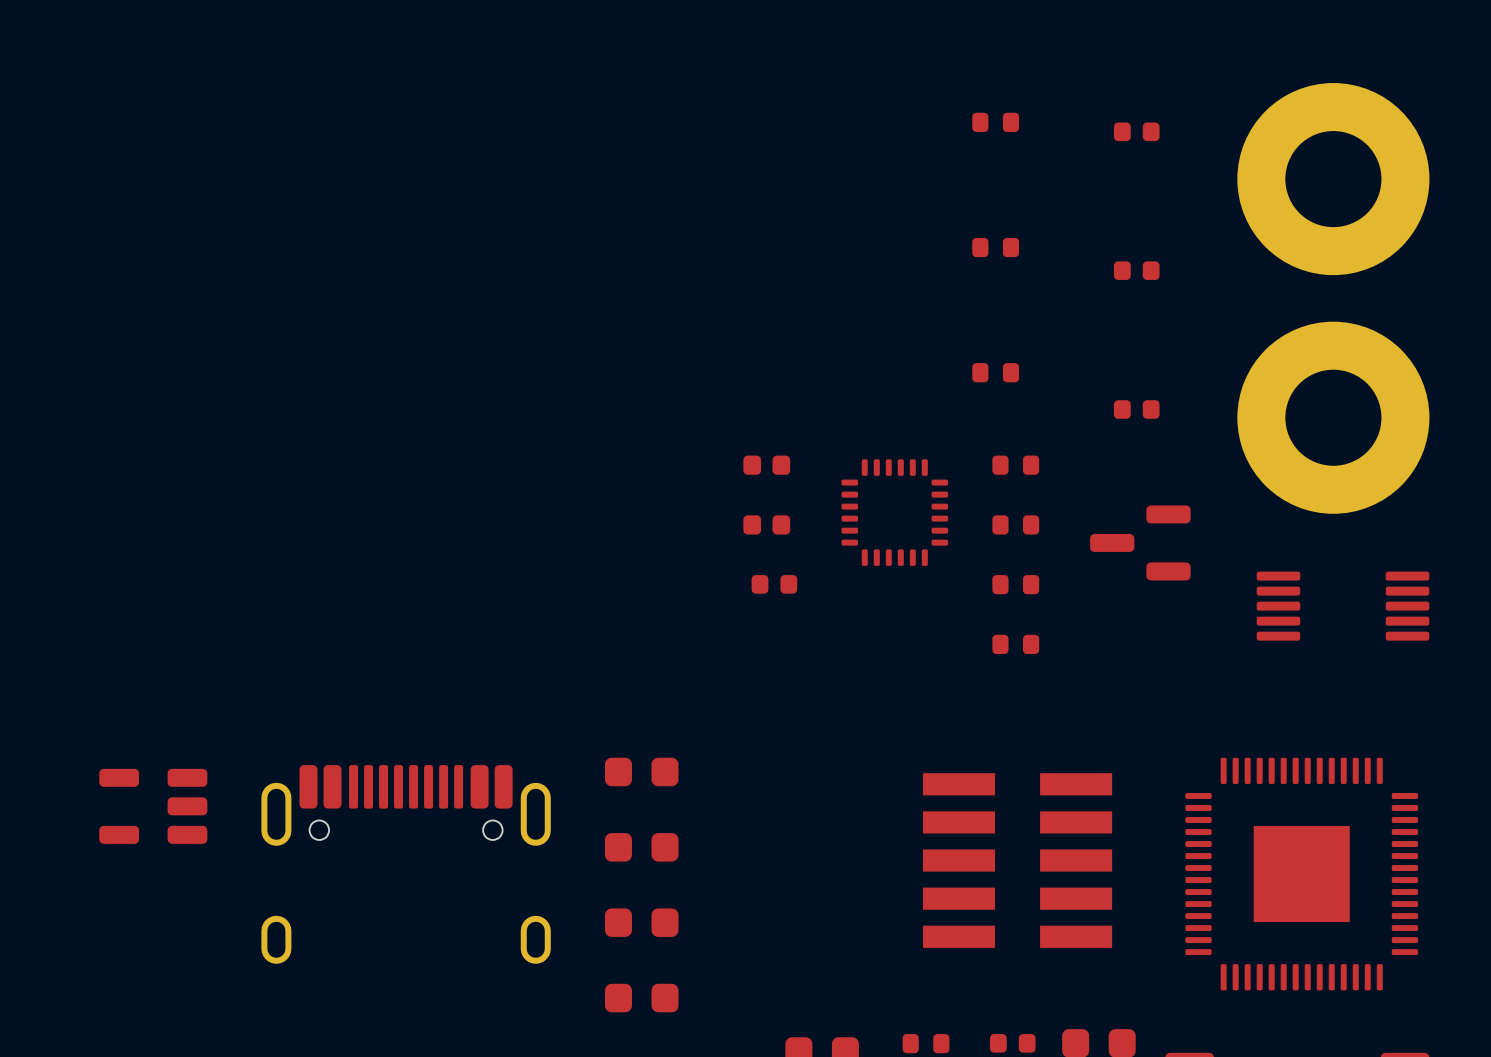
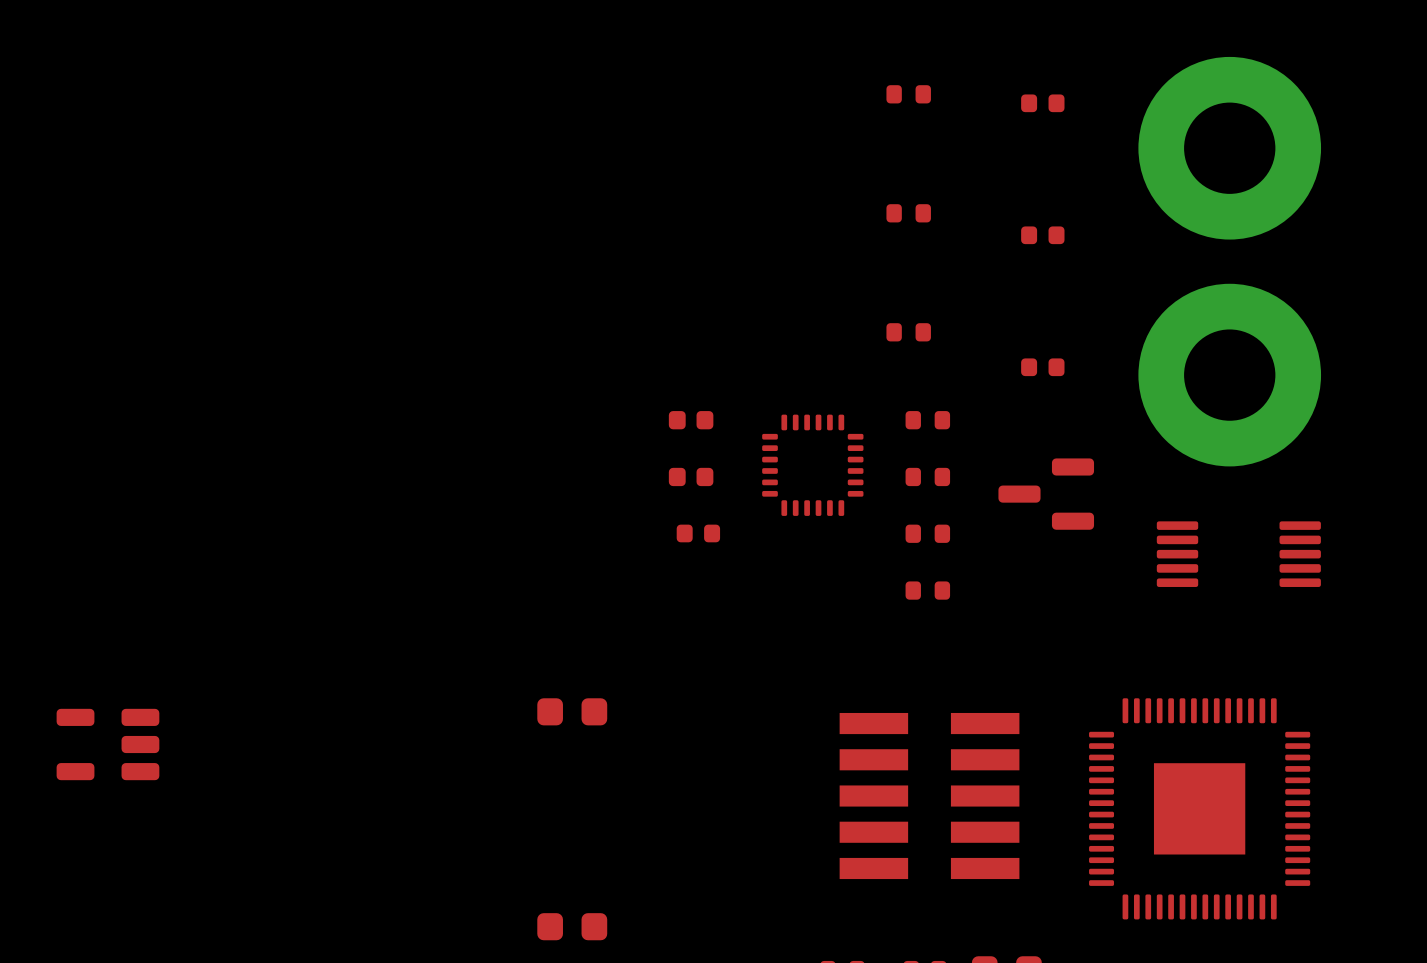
part: (641, 847) -> none
part: (406, 864) -> none
part: (641, 922) -> none

